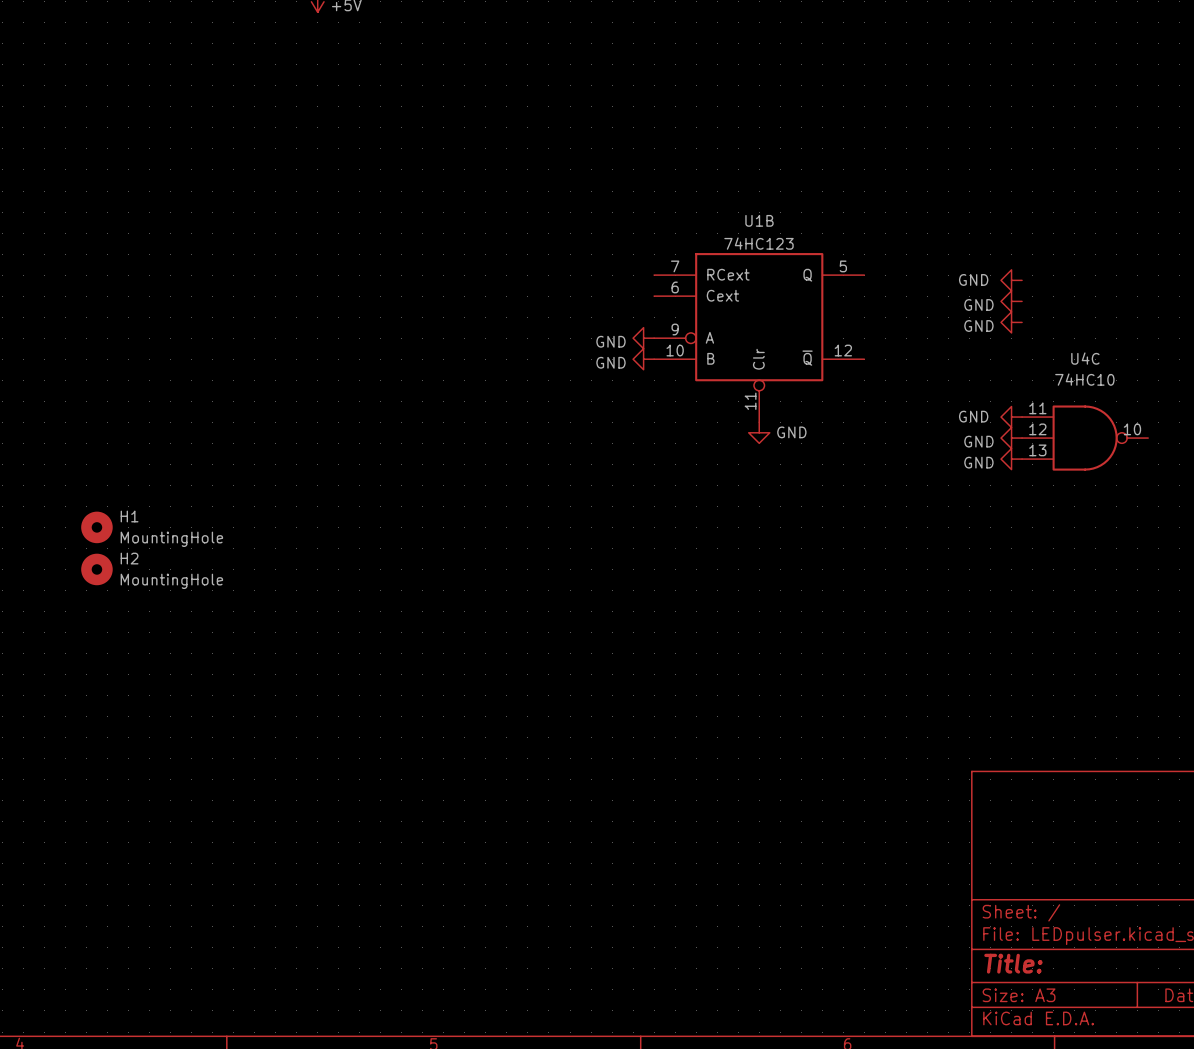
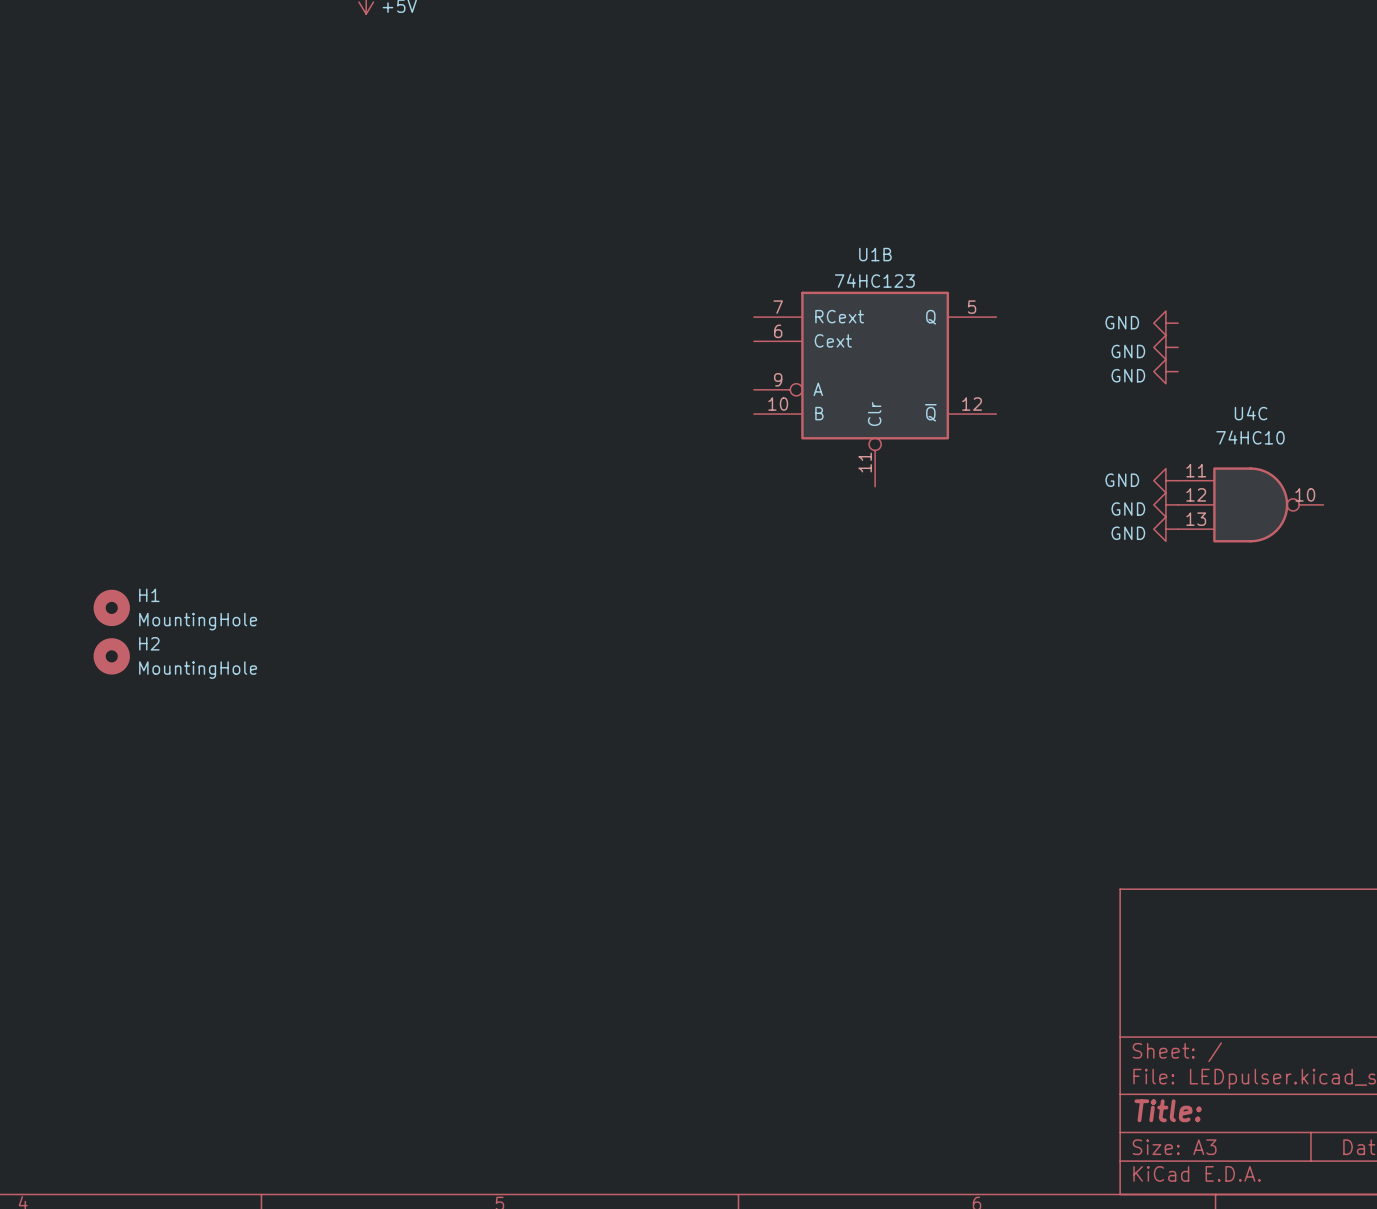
power symbol: GND (643, 338) -> none
power symbol: GND (643, 359) -> none
power symbol: GND (759, 432) -> none

